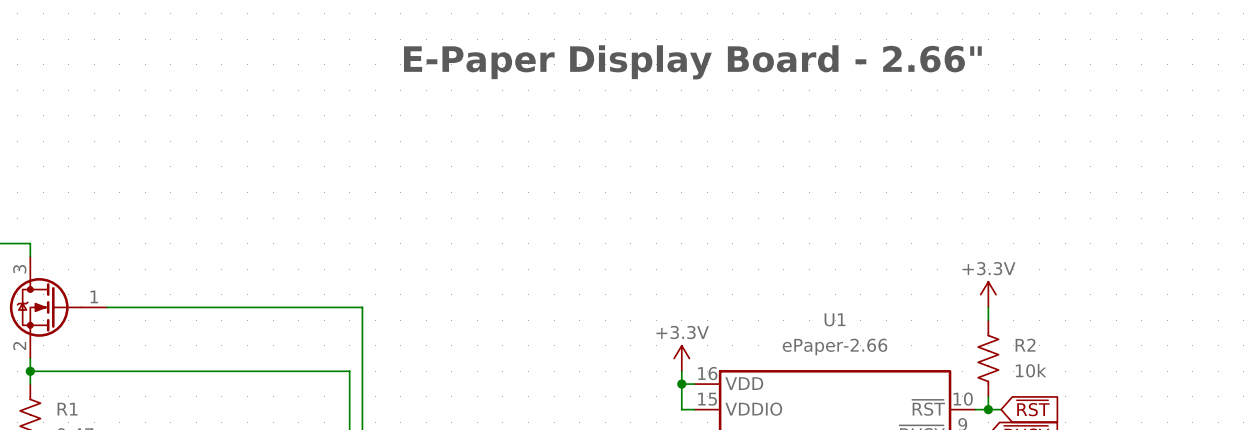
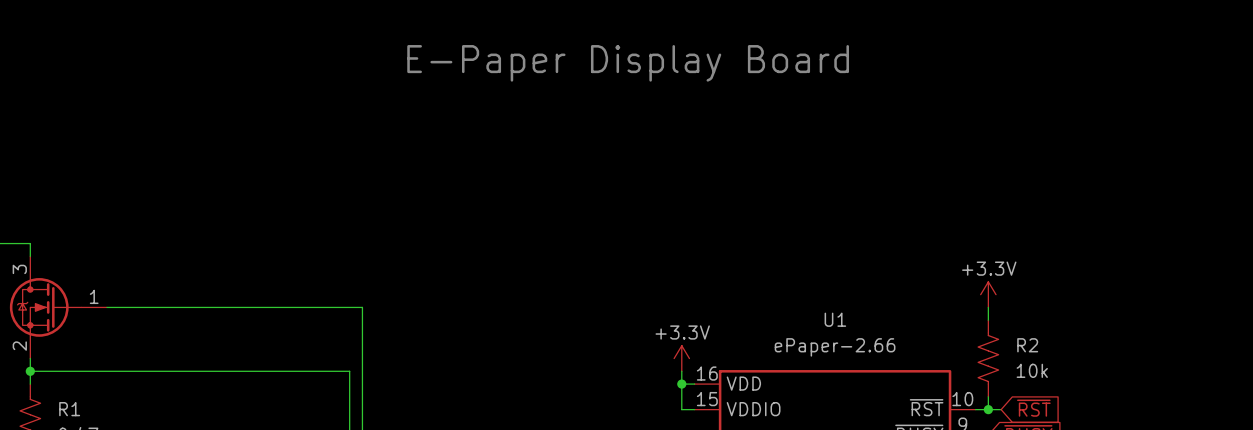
text: E-Paper Display Board - 2.66" (692, 62) -> E-Paper Display Board (628, 63)

